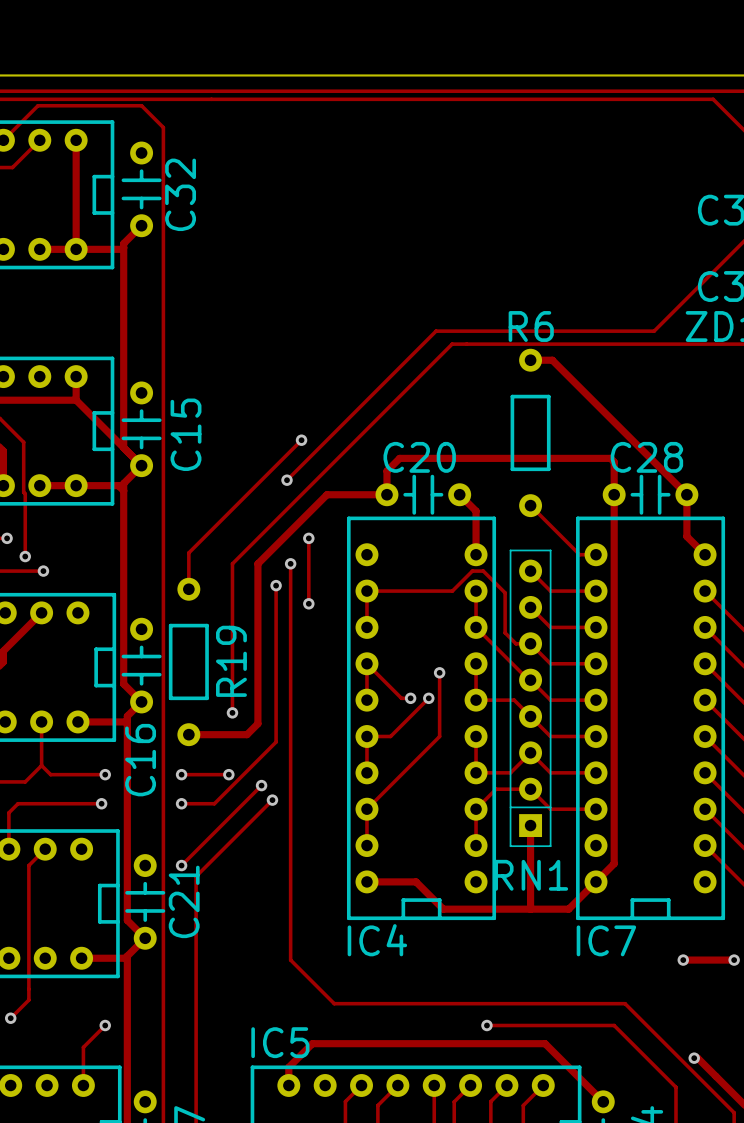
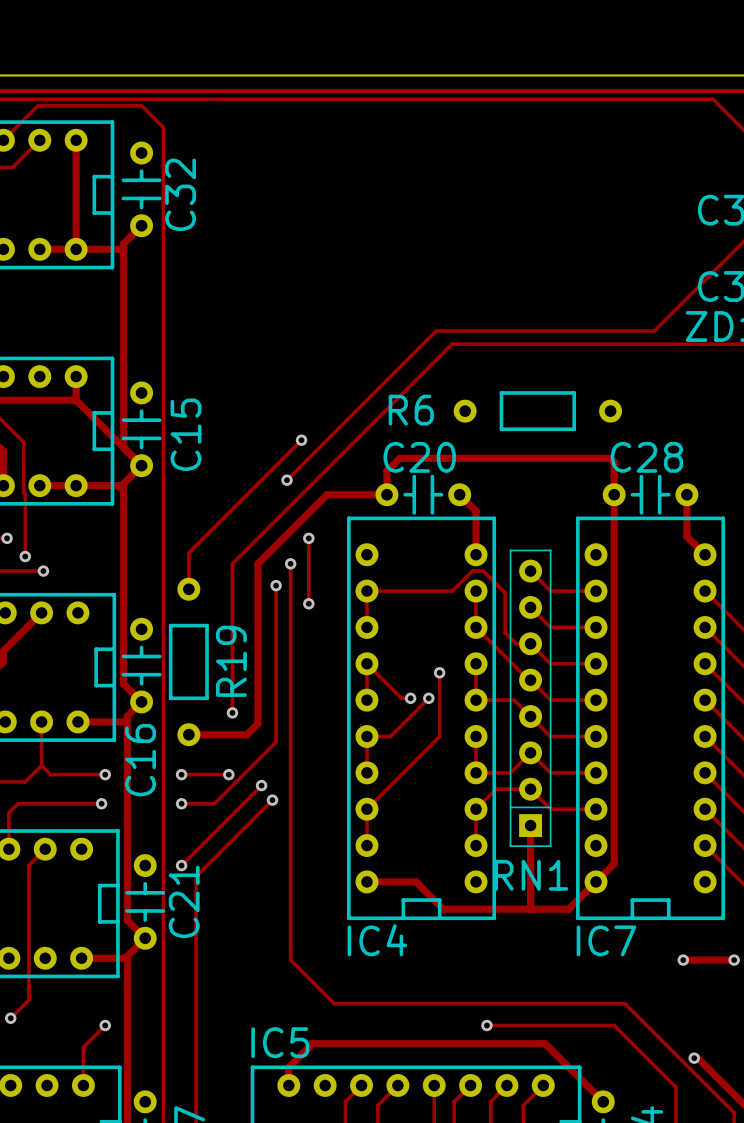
R6 name position: R6 (531, 326) -> R6 (411, 410)
track: (530, 360) (552, 360) (686, 494) -> none
R6 rotation: 0° (530, 432) -> 90° clockwise (537, 411)
track: (530, 505) (579, 554) (596, 554) -> none

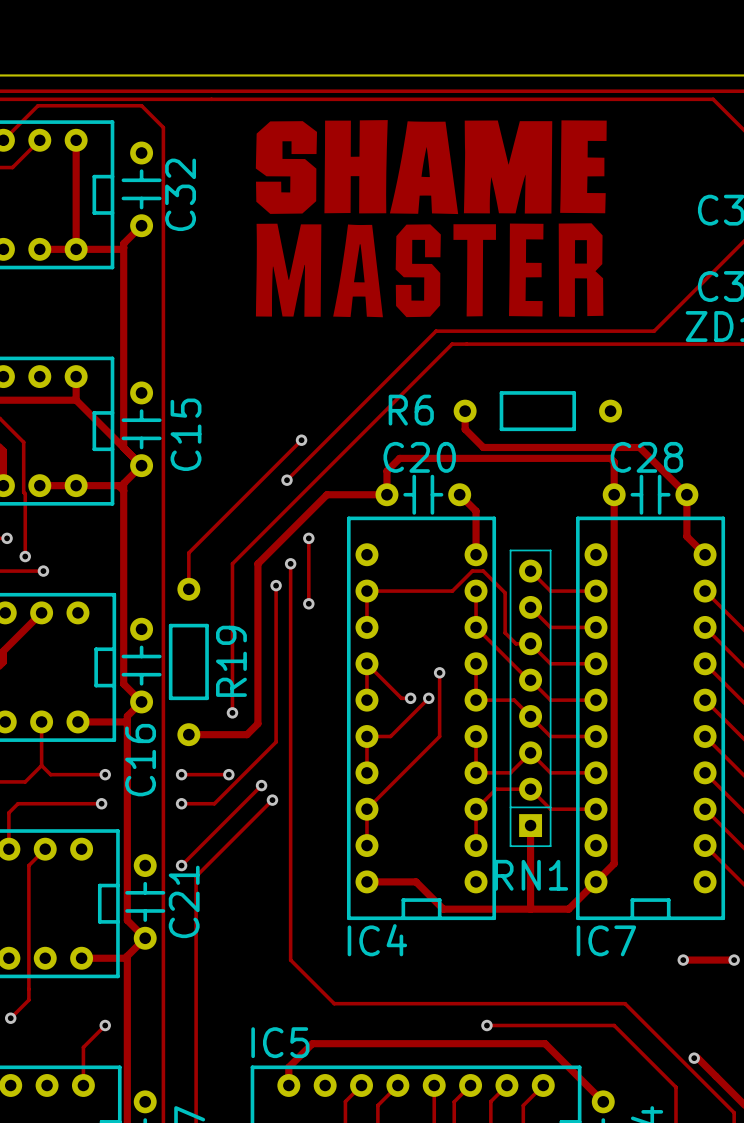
drawing: none -> [255, 120, 607, 318]
track: none -> (465, 411) (465, 429) (483, 447) (639, 447) (686, 494)

